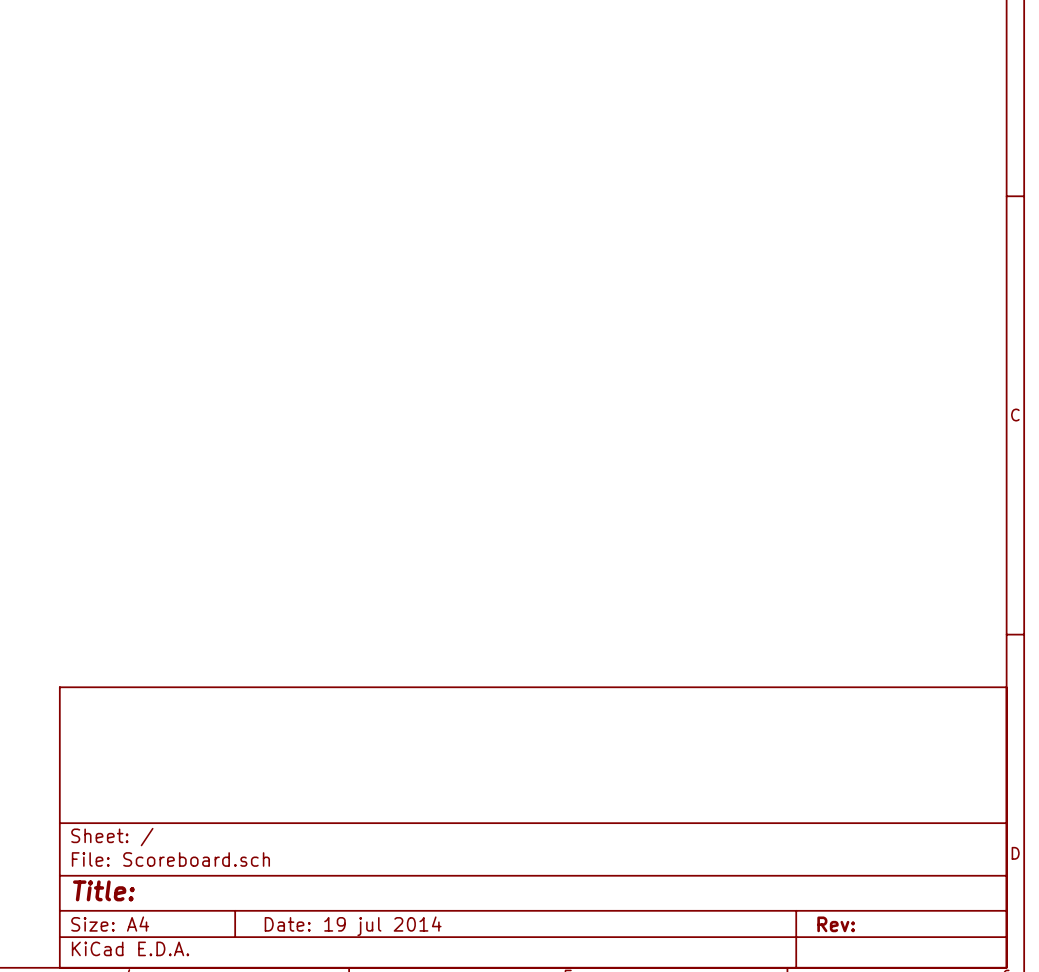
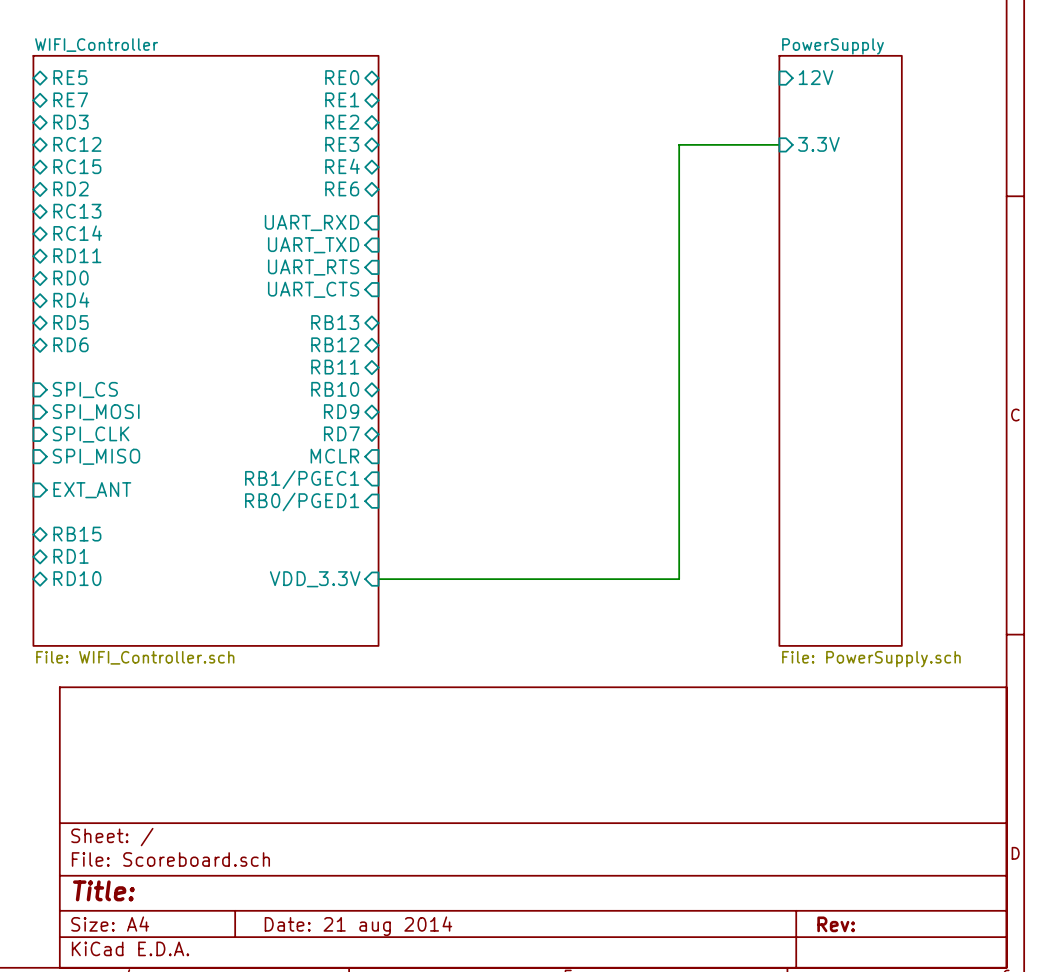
sheet pin: none -> RE5 (70, 77)
sheet pin: none -> RE0 (342, 77)
sheet pin: none -> 12V (816, 77)
sheet pin: none -> RE7 (70, 99)
sheet pin: none -> RE1 (342, 99)
sheet pin: none -> RD3 (71, 122)
sheet pin: none -> RE2 (342, 122)
sheet pin: none -> RC12 (77, 144)
sheet pin: none -> RE3 (342, 144)
wire: none -> (779, 144) (679, 144) (679, 579) (378, 579)
sheet pin: none -> 3.3V (818, 144)
sheet pin: none -> RC15 (77, 166)
sheet pin: none -> RE4 (342, 166)
sheet pin: none -> RD2 (71, 188)
sheet pin: none -> RE6 (342, 188)
sheet pin: none -> RC13 (77, 211)
sheet pin: none -> UART_RXD (311, 222)
sheet pin: none -> RC14 (77, 233)
sheet pin: none -> UART_TXD (313, 245)
sheet pin: none -> RD11 (77, 255)
sheet pin: none -> UART_RTS (313, 267)
sheet pin: none -> RD0 (71, 278)
sheet pin: none -> UART_CTS (313, 289)
sheet pin: none -> RD4 (71, 299)
sheet pin: none -> RD5 (71, 322)
sheet pin: none -> RB13 (335, 322)
sheet pin: none -> RD6 (71, 344)
sheet pin: none -> RB12 (335, 344)
sheet WIFI_Controller: none -> File: WIFI_Controller.sch (205, 350)
sheet PowerSupply: none -> File: PowerSupply.sch (840, 350)
sheet pin: none -> RB11 (335, 367)
sheet pin: none -> SPI_CS (85, 389)
sheet pin: none -> RB10 (335, 389)
sheet pin: none -> RD9 (341, 411)
sheet pin: none -> SPI_MOSI (96, 412)
sheet pin: none -> RD7 (341, 433)
sheet pin: none -> SPI_CLK (91, 434)
sheet pin: none -> SPI_MISO (96, 456)
sheet pin: none -> MCLR (334, 456)
sheet pin: none -> RB1/PGEC1 (302, 479)
sheet pin: none -> EXT_ANT (92, 490)
sheet pin: none -> RB0/PGED1 (302, 501)
sheet pin: none -> RB15 (77, 534)
sheet pin: none -> RD1 (71, 556)
sheet pin: none -> RD10 (77, 578)
sheet pin: none -> VDD_3.3V (315, 579)
title block: Date: 19 jul 2014 (353, 926) -> Date: 21 aug 2014 (358, 926)

